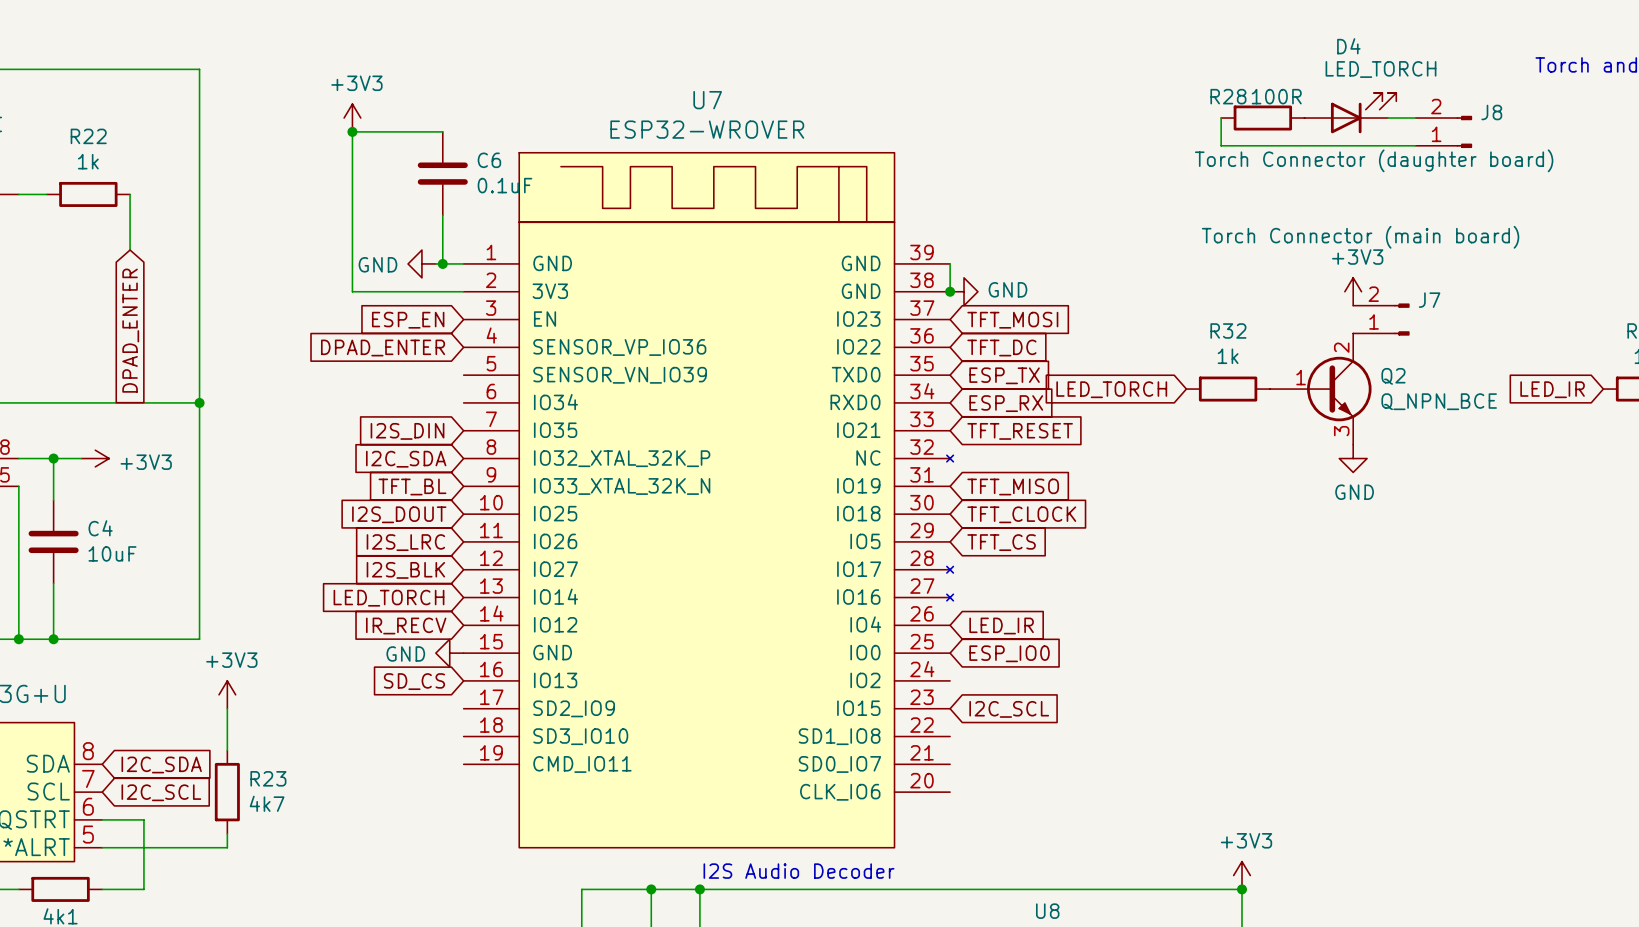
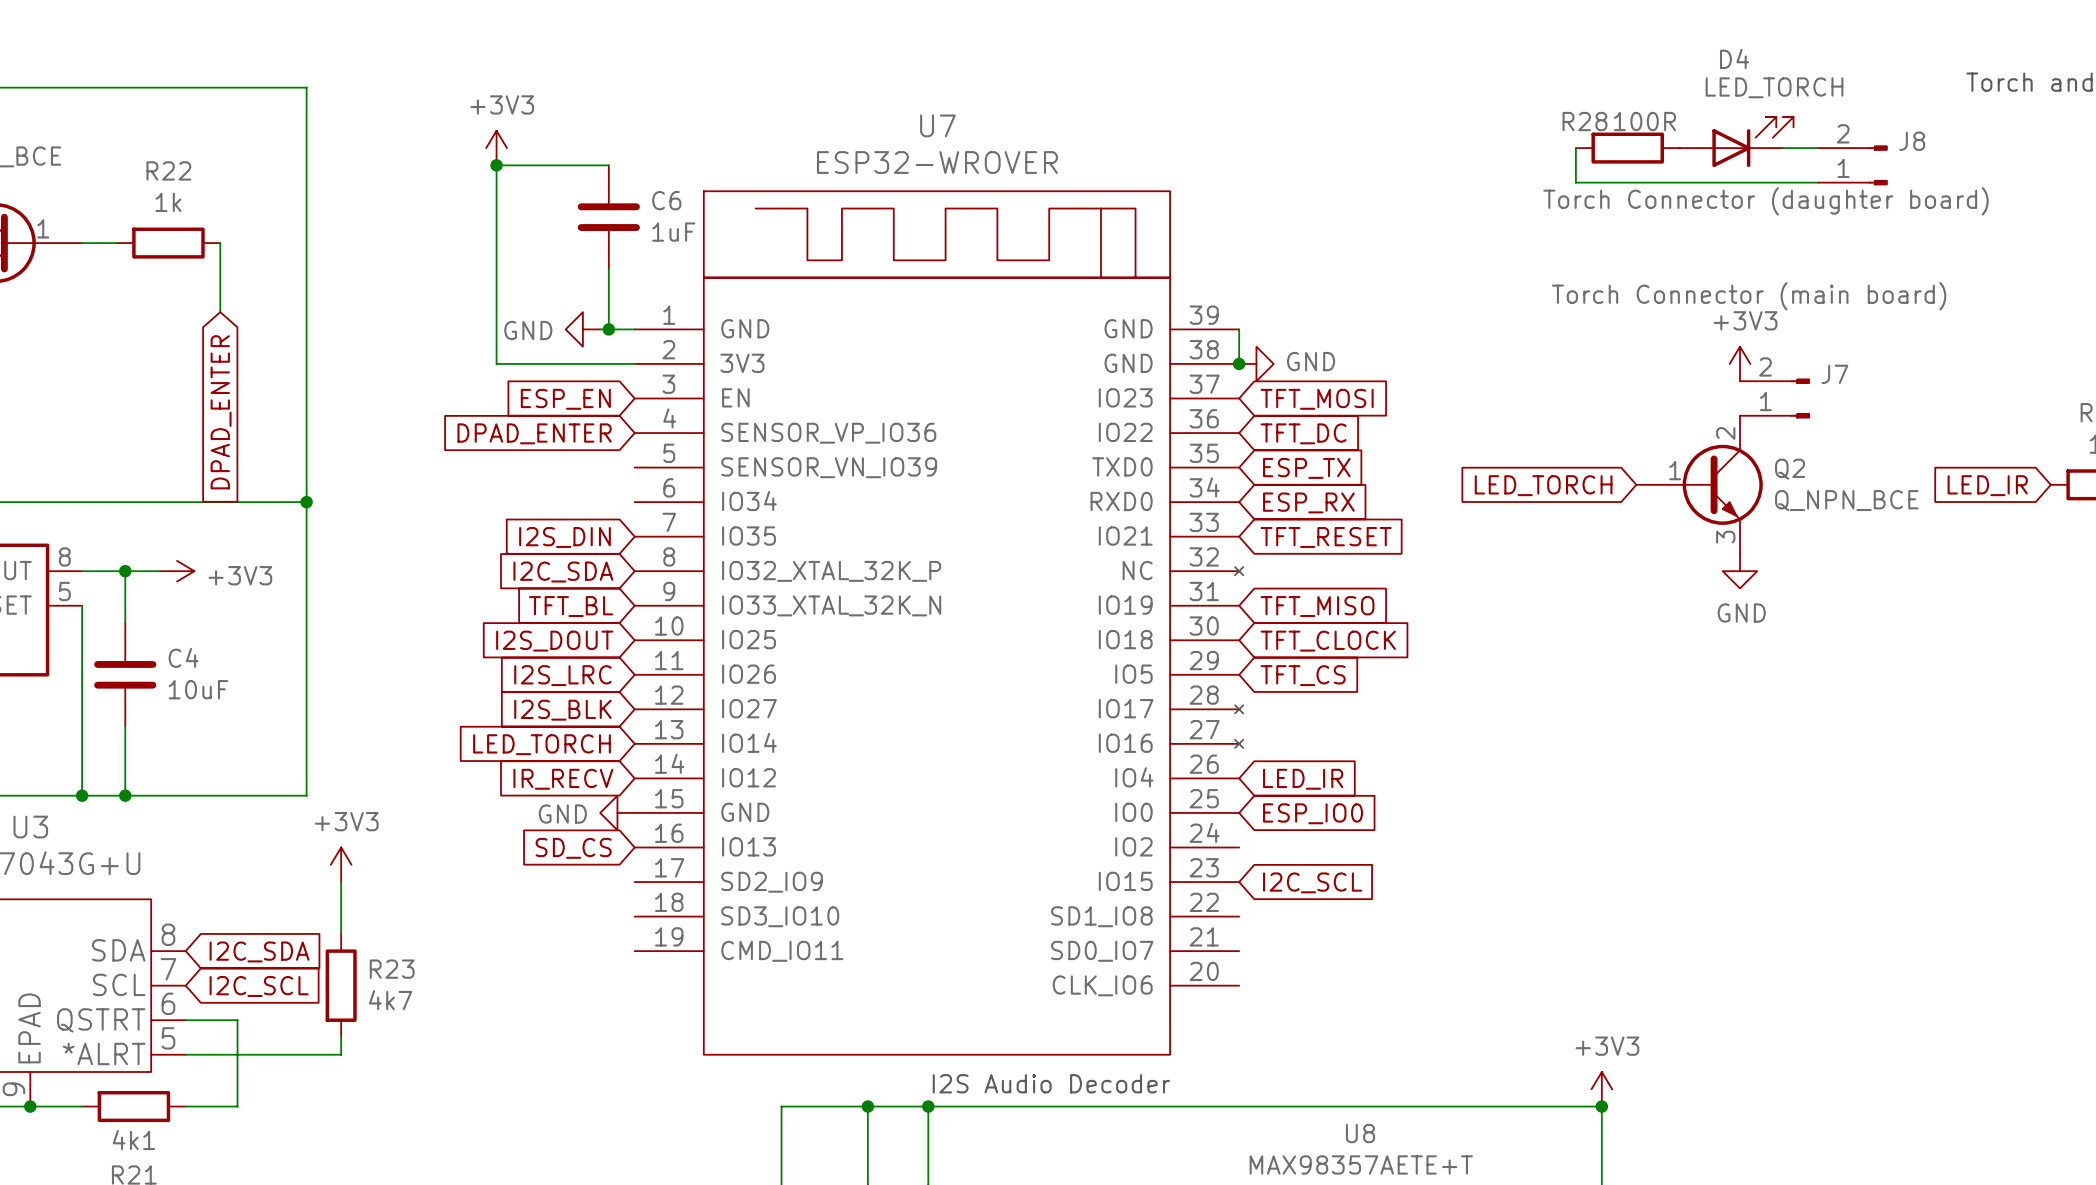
C6 value: 0.1uF (504, 185) -> 1uF (673, 232)
global label position: LED_TORCH (1111, 389) -> LED_TORCH (1543, 485)
R32: 1k (1228, 389) -> none

